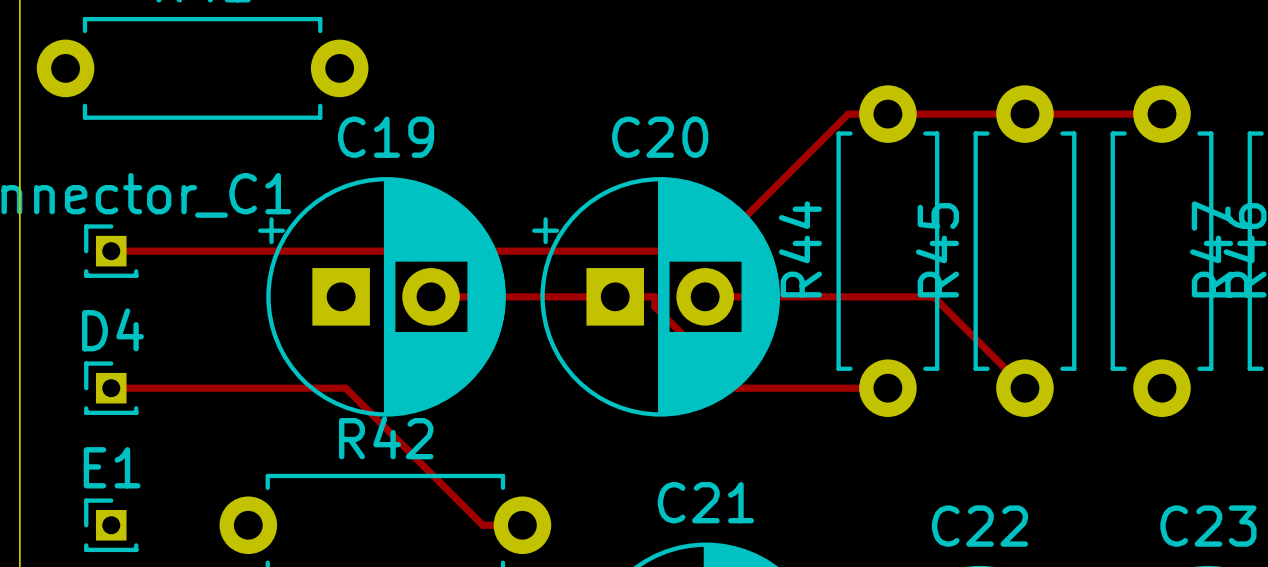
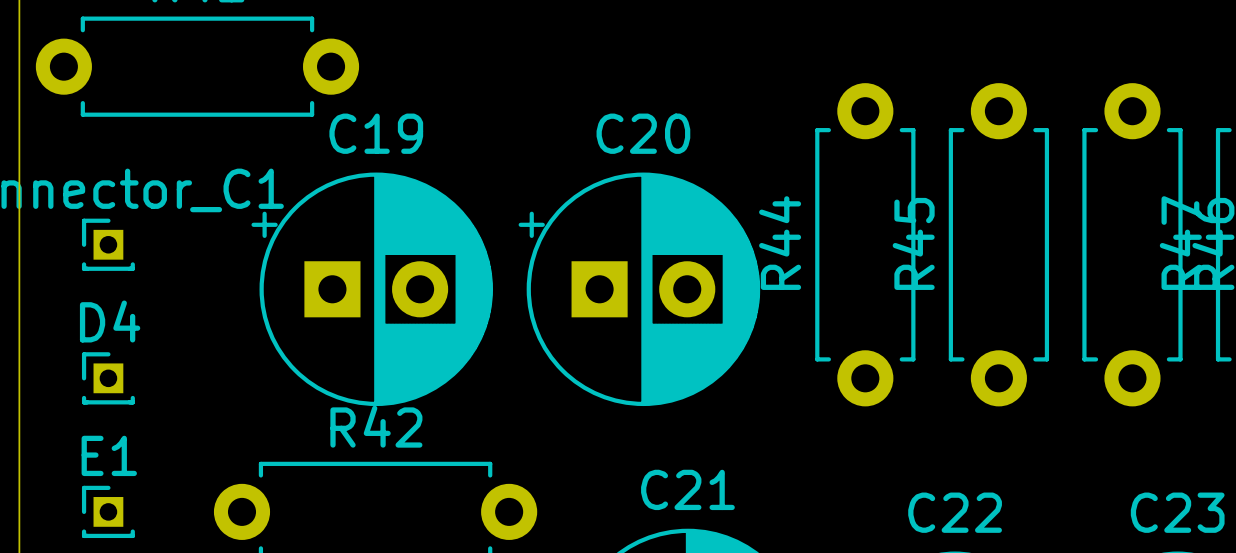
track: (1162, 114) (848, 114) (711, 251) (111, 251) -> none
track: (431, 296) (654, 296) (654, 306) (736, 388) (887, 388) -> none
track: (705, 296) (933, 296) (1024, 388) -> none
track: (111, 388) (345, 388) (482, 525) (522, 525) -> none

